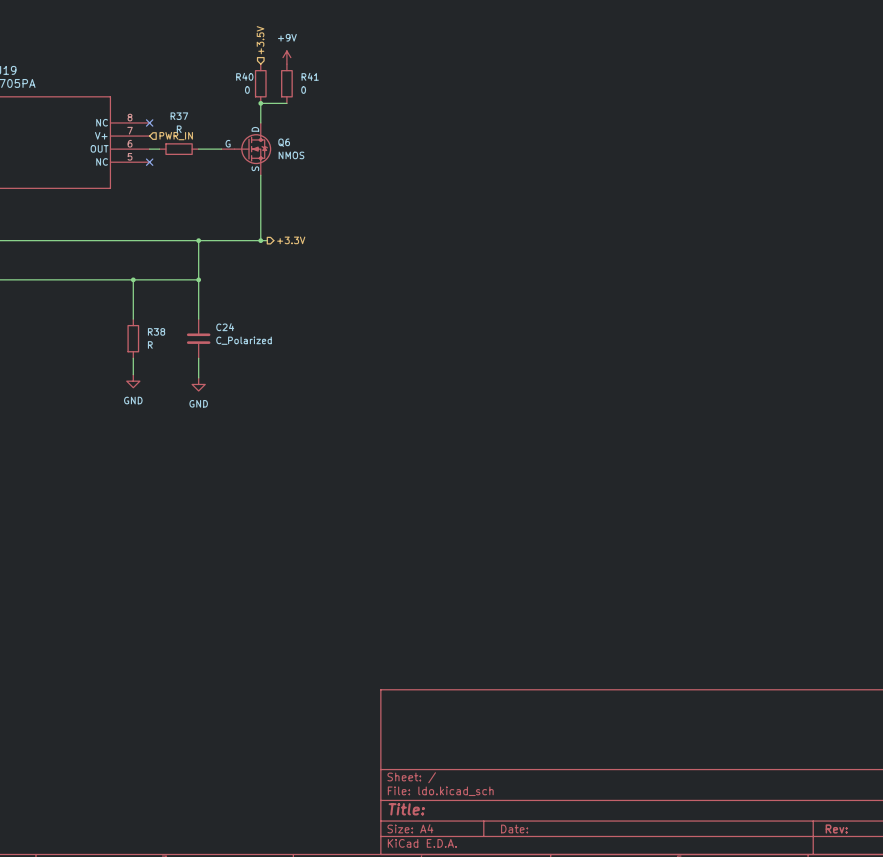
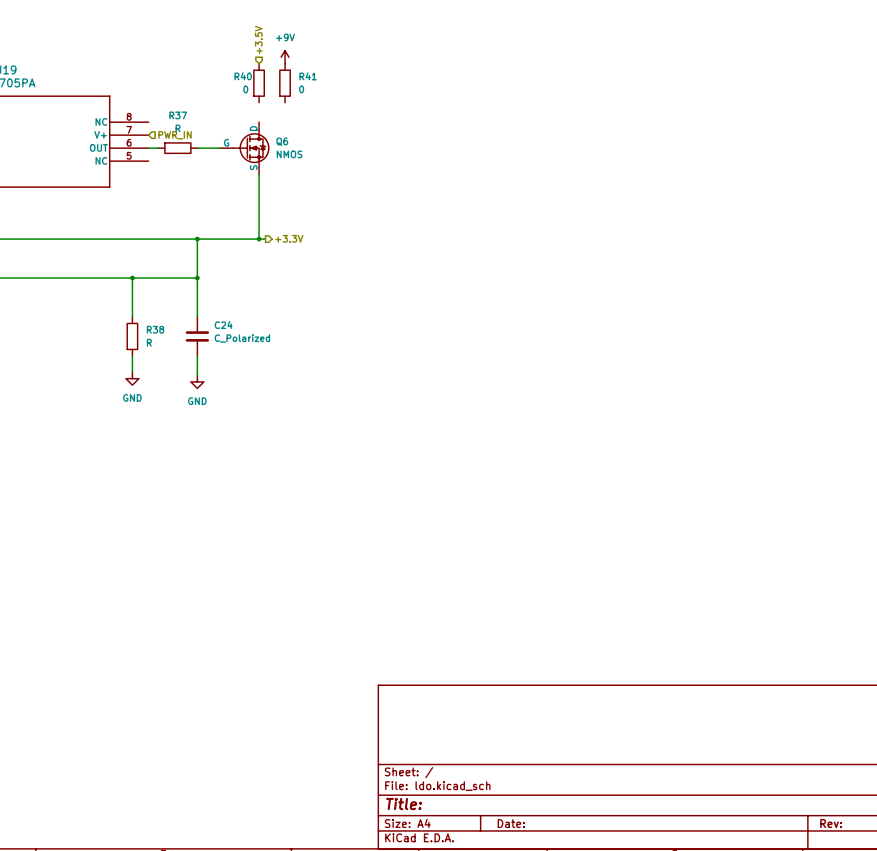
junction: (260, 103) -> none
wire: (286, 103) (260, 103) (260, 122) -> none
no-connect mark: (149, 122) -> none
no-connect mark: (149, 162) -> none

